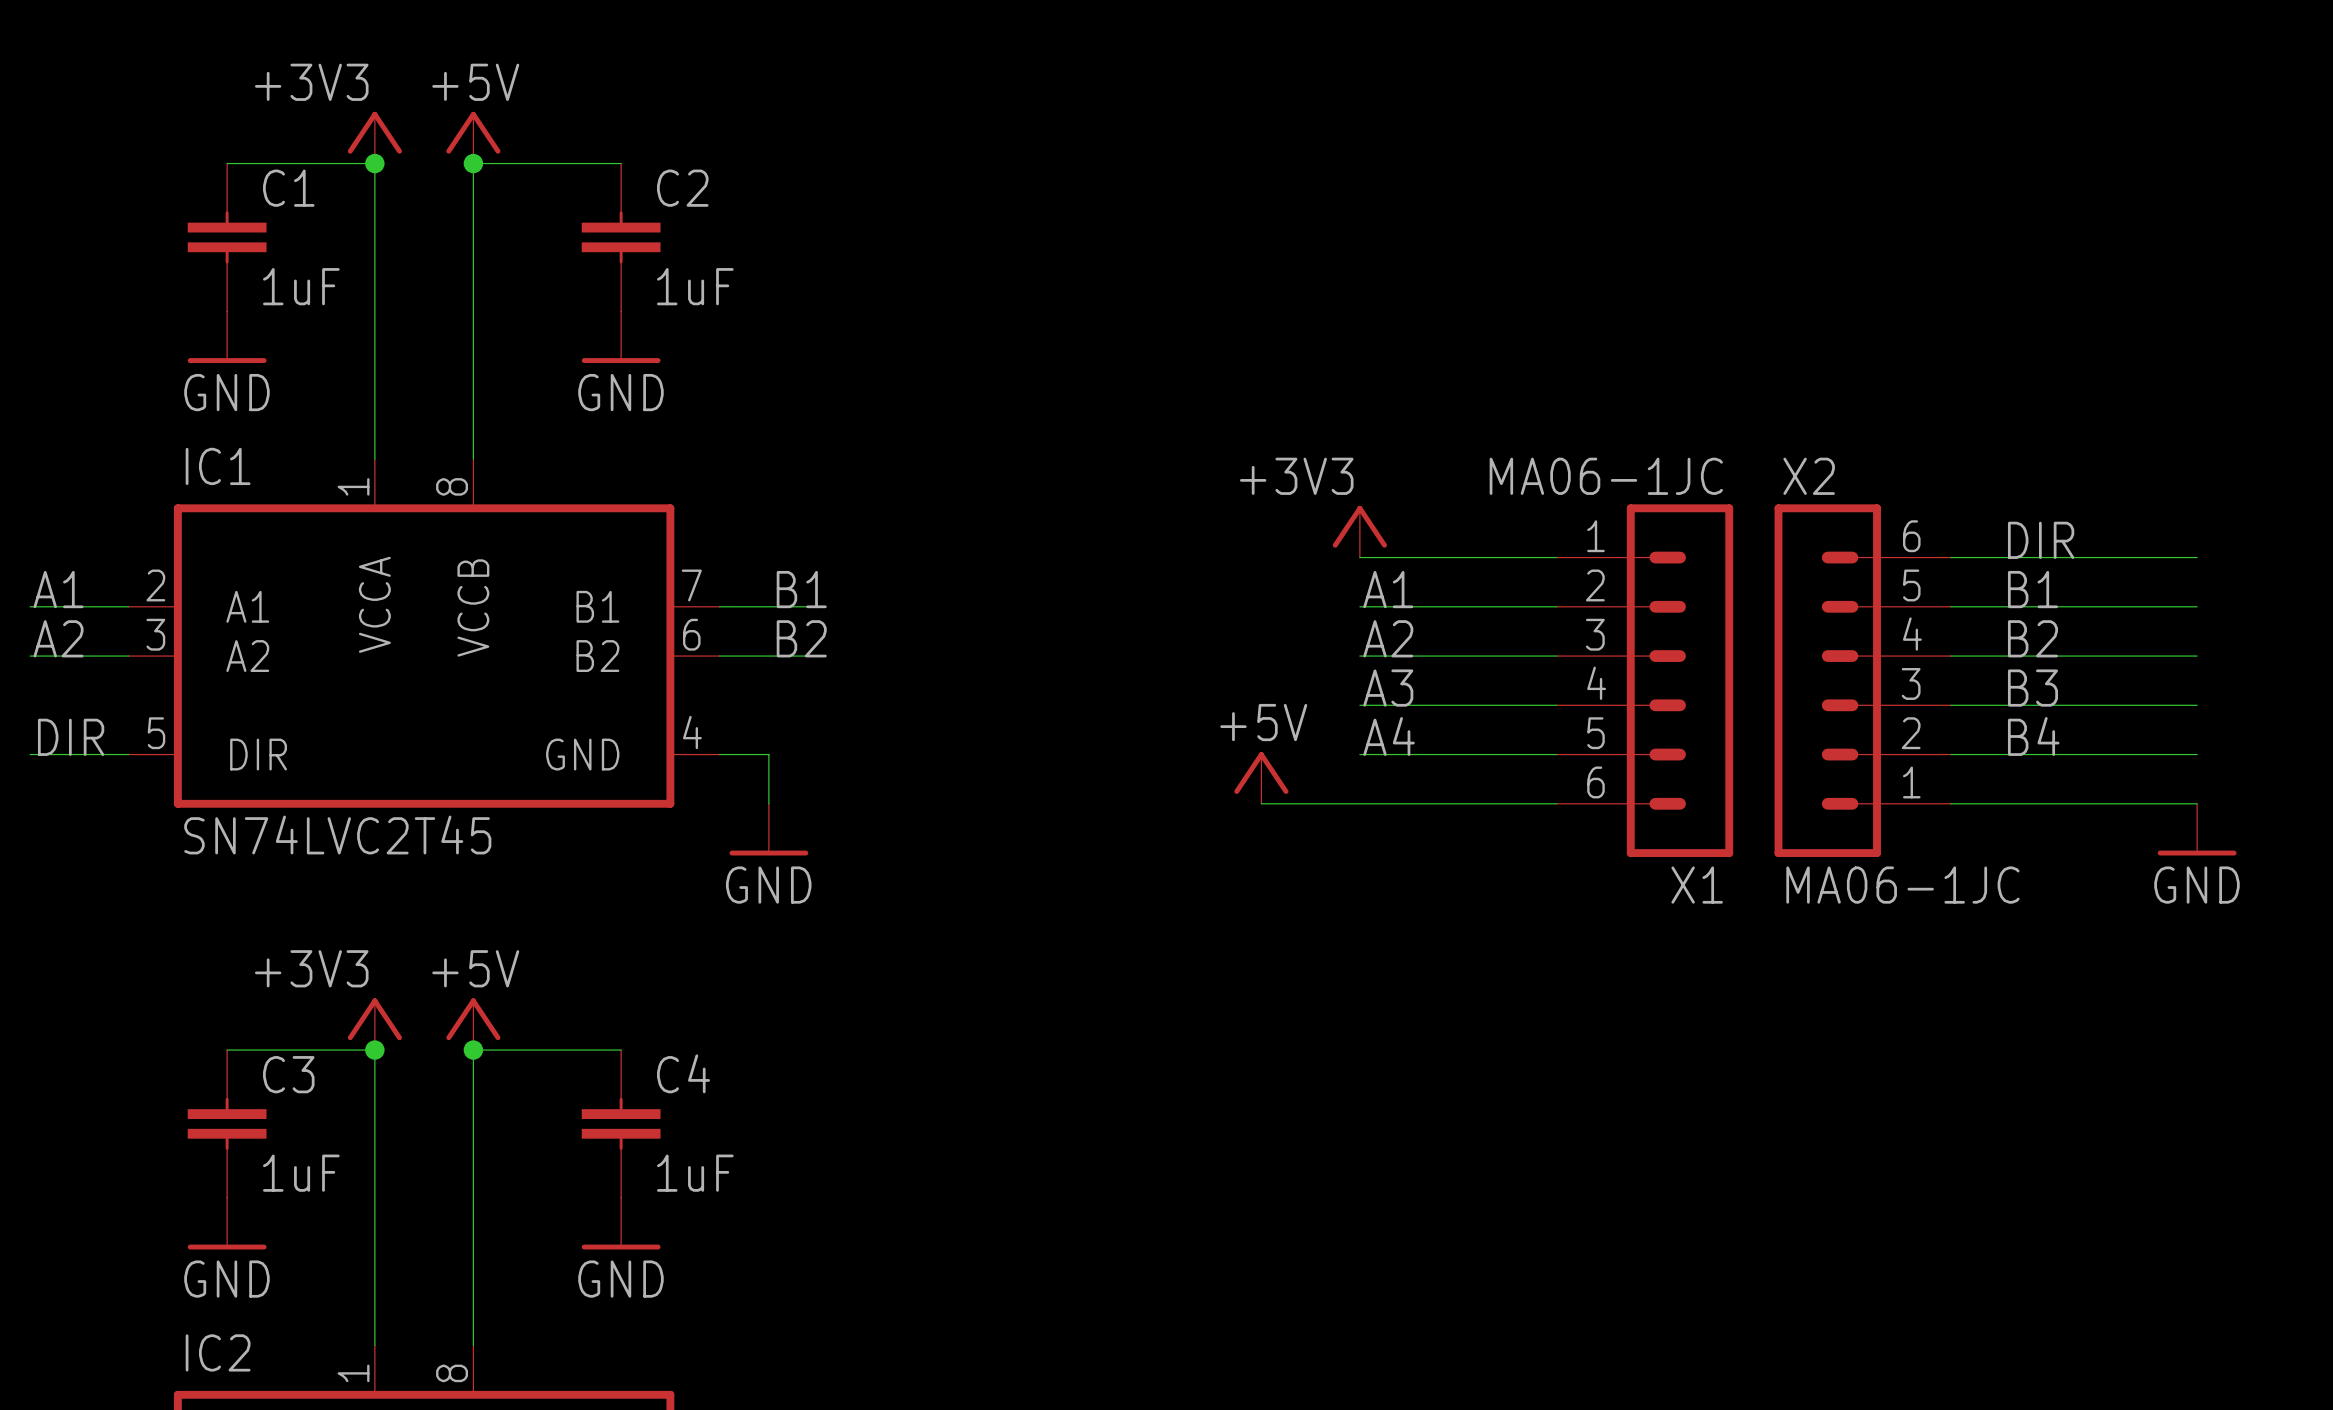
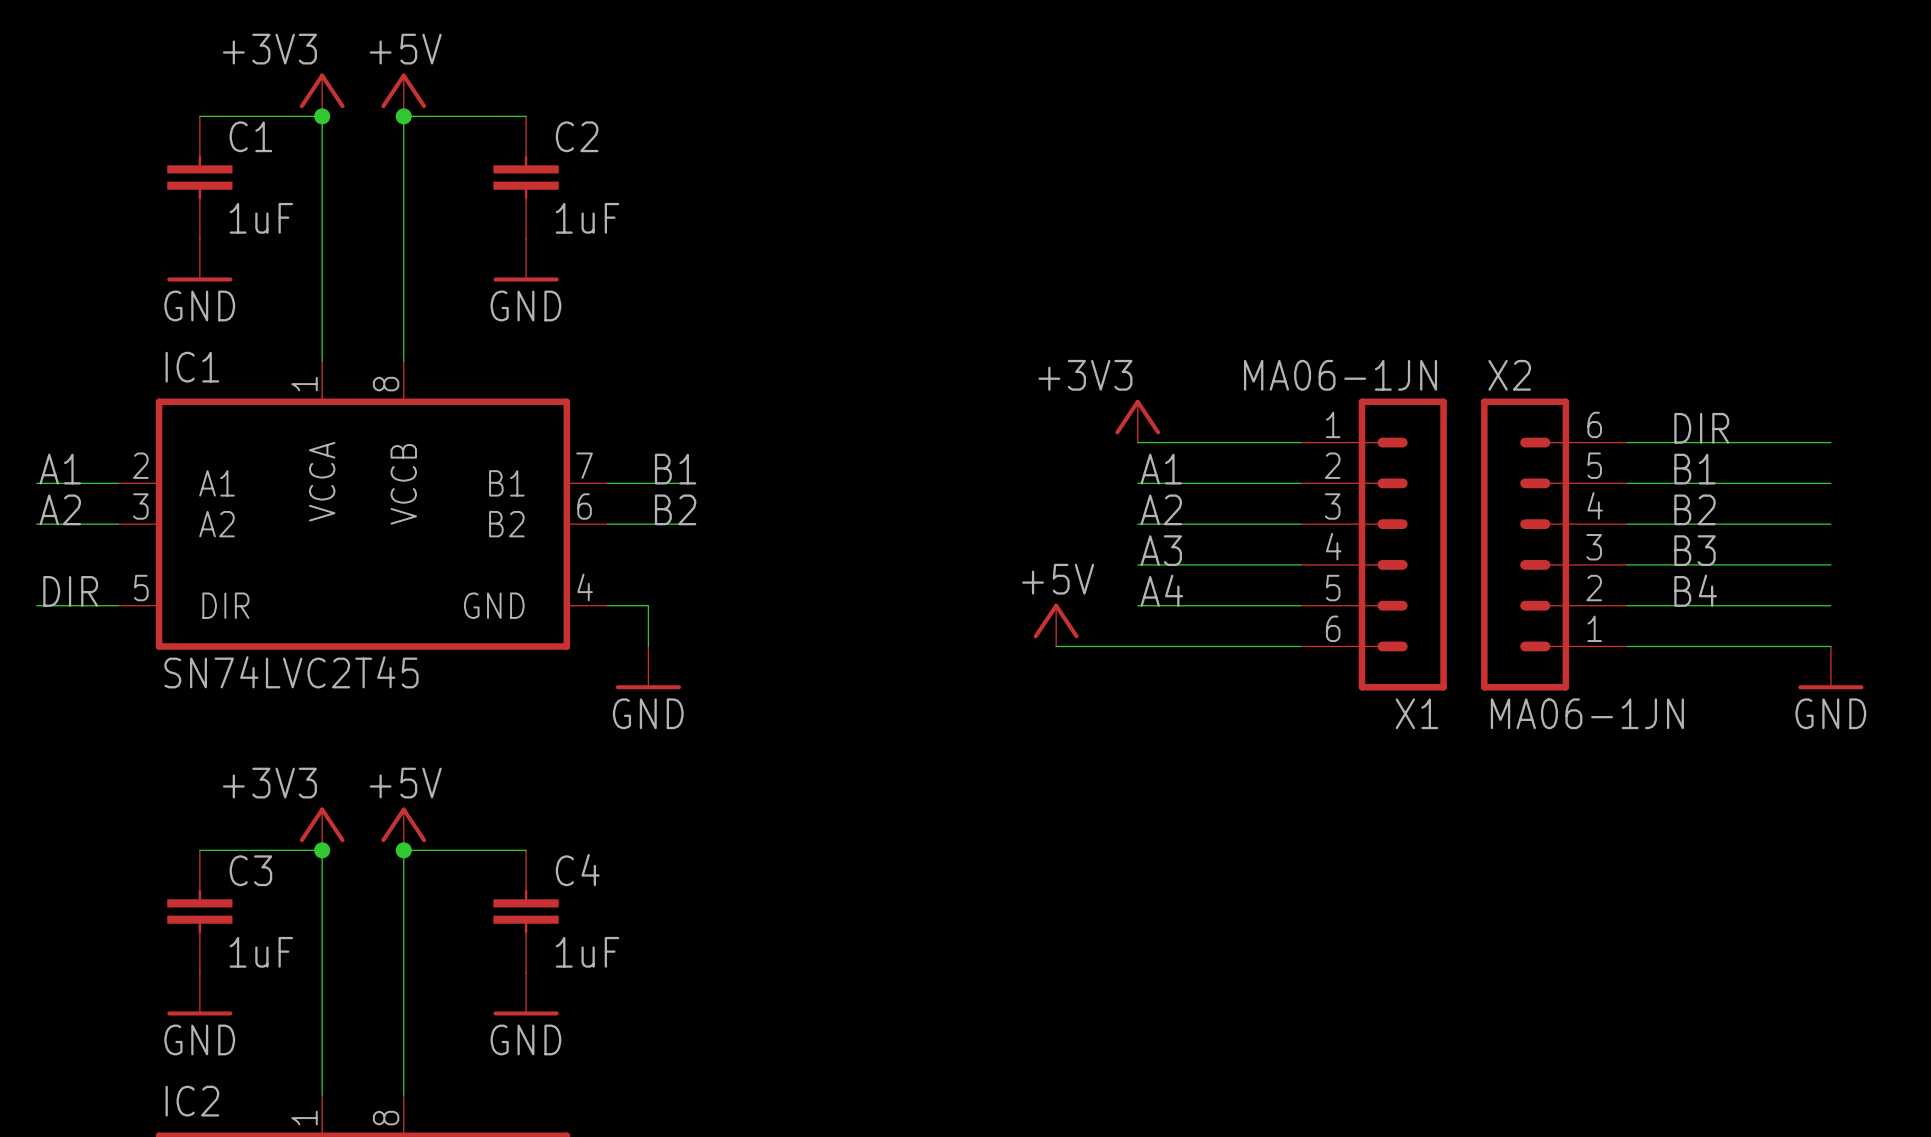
X1 value: MA06-1JC (1606, 476) -> MA06-1JN (1340, 375)
X2 value: MA06-1JC (1902, 885) -> MA06-1JN (1587, 713)

